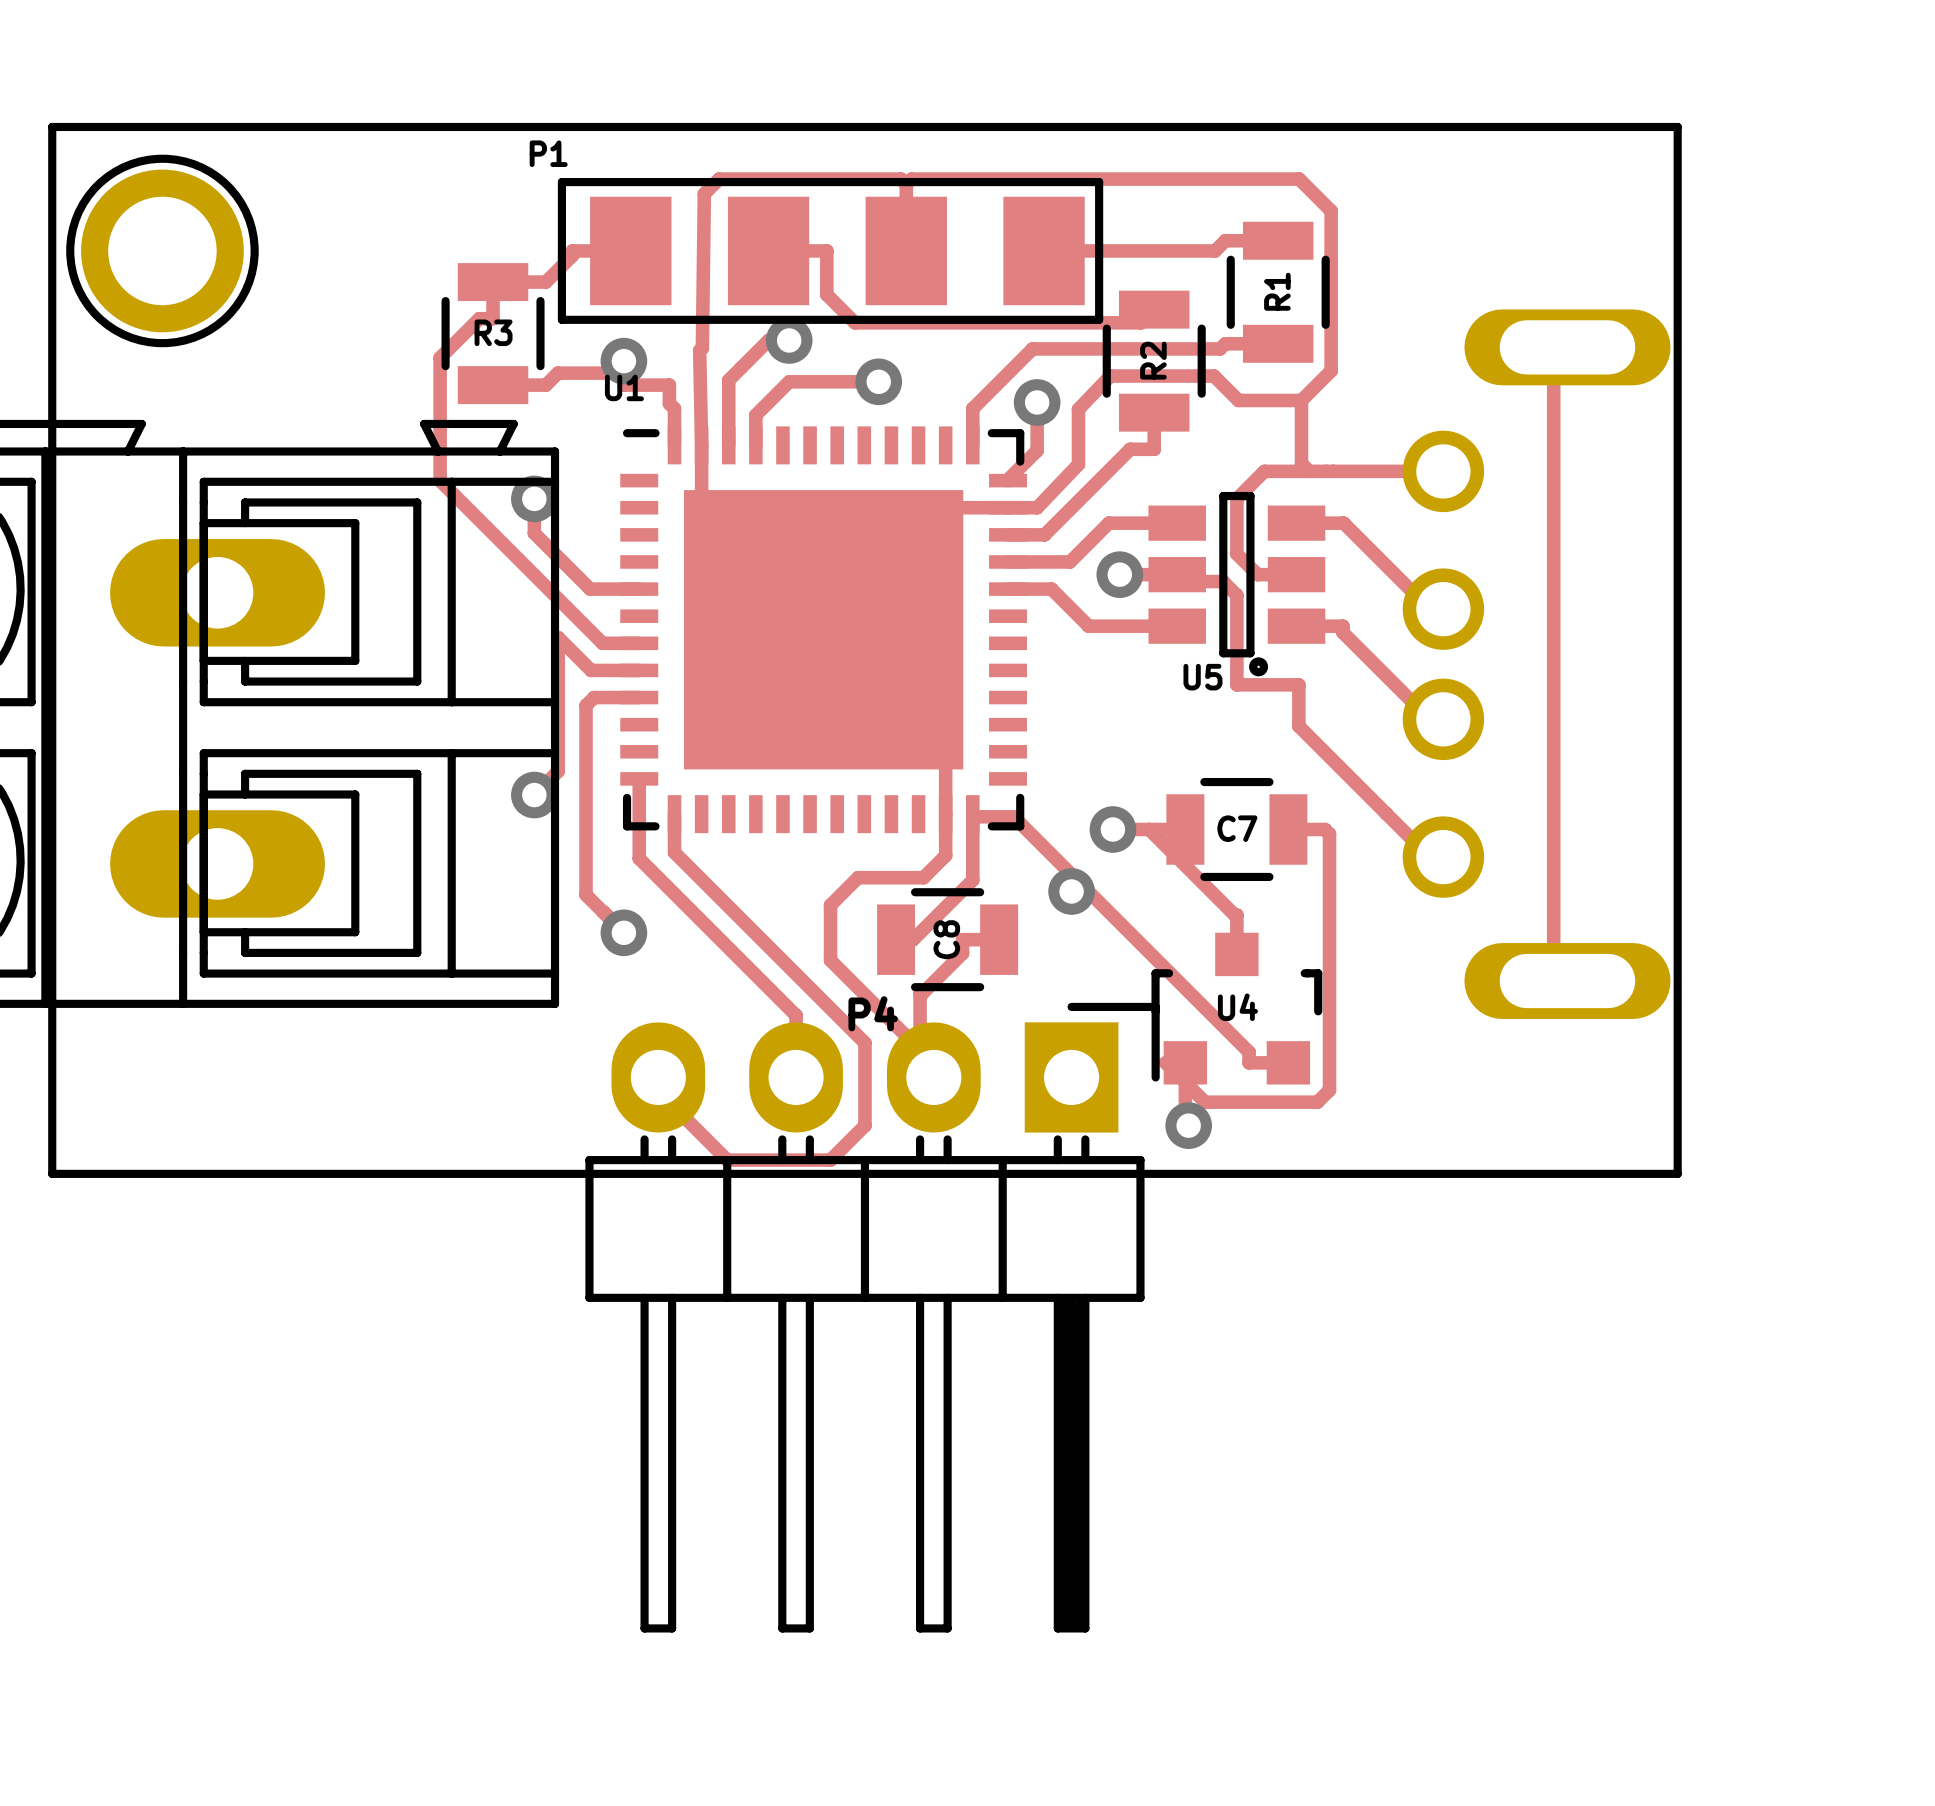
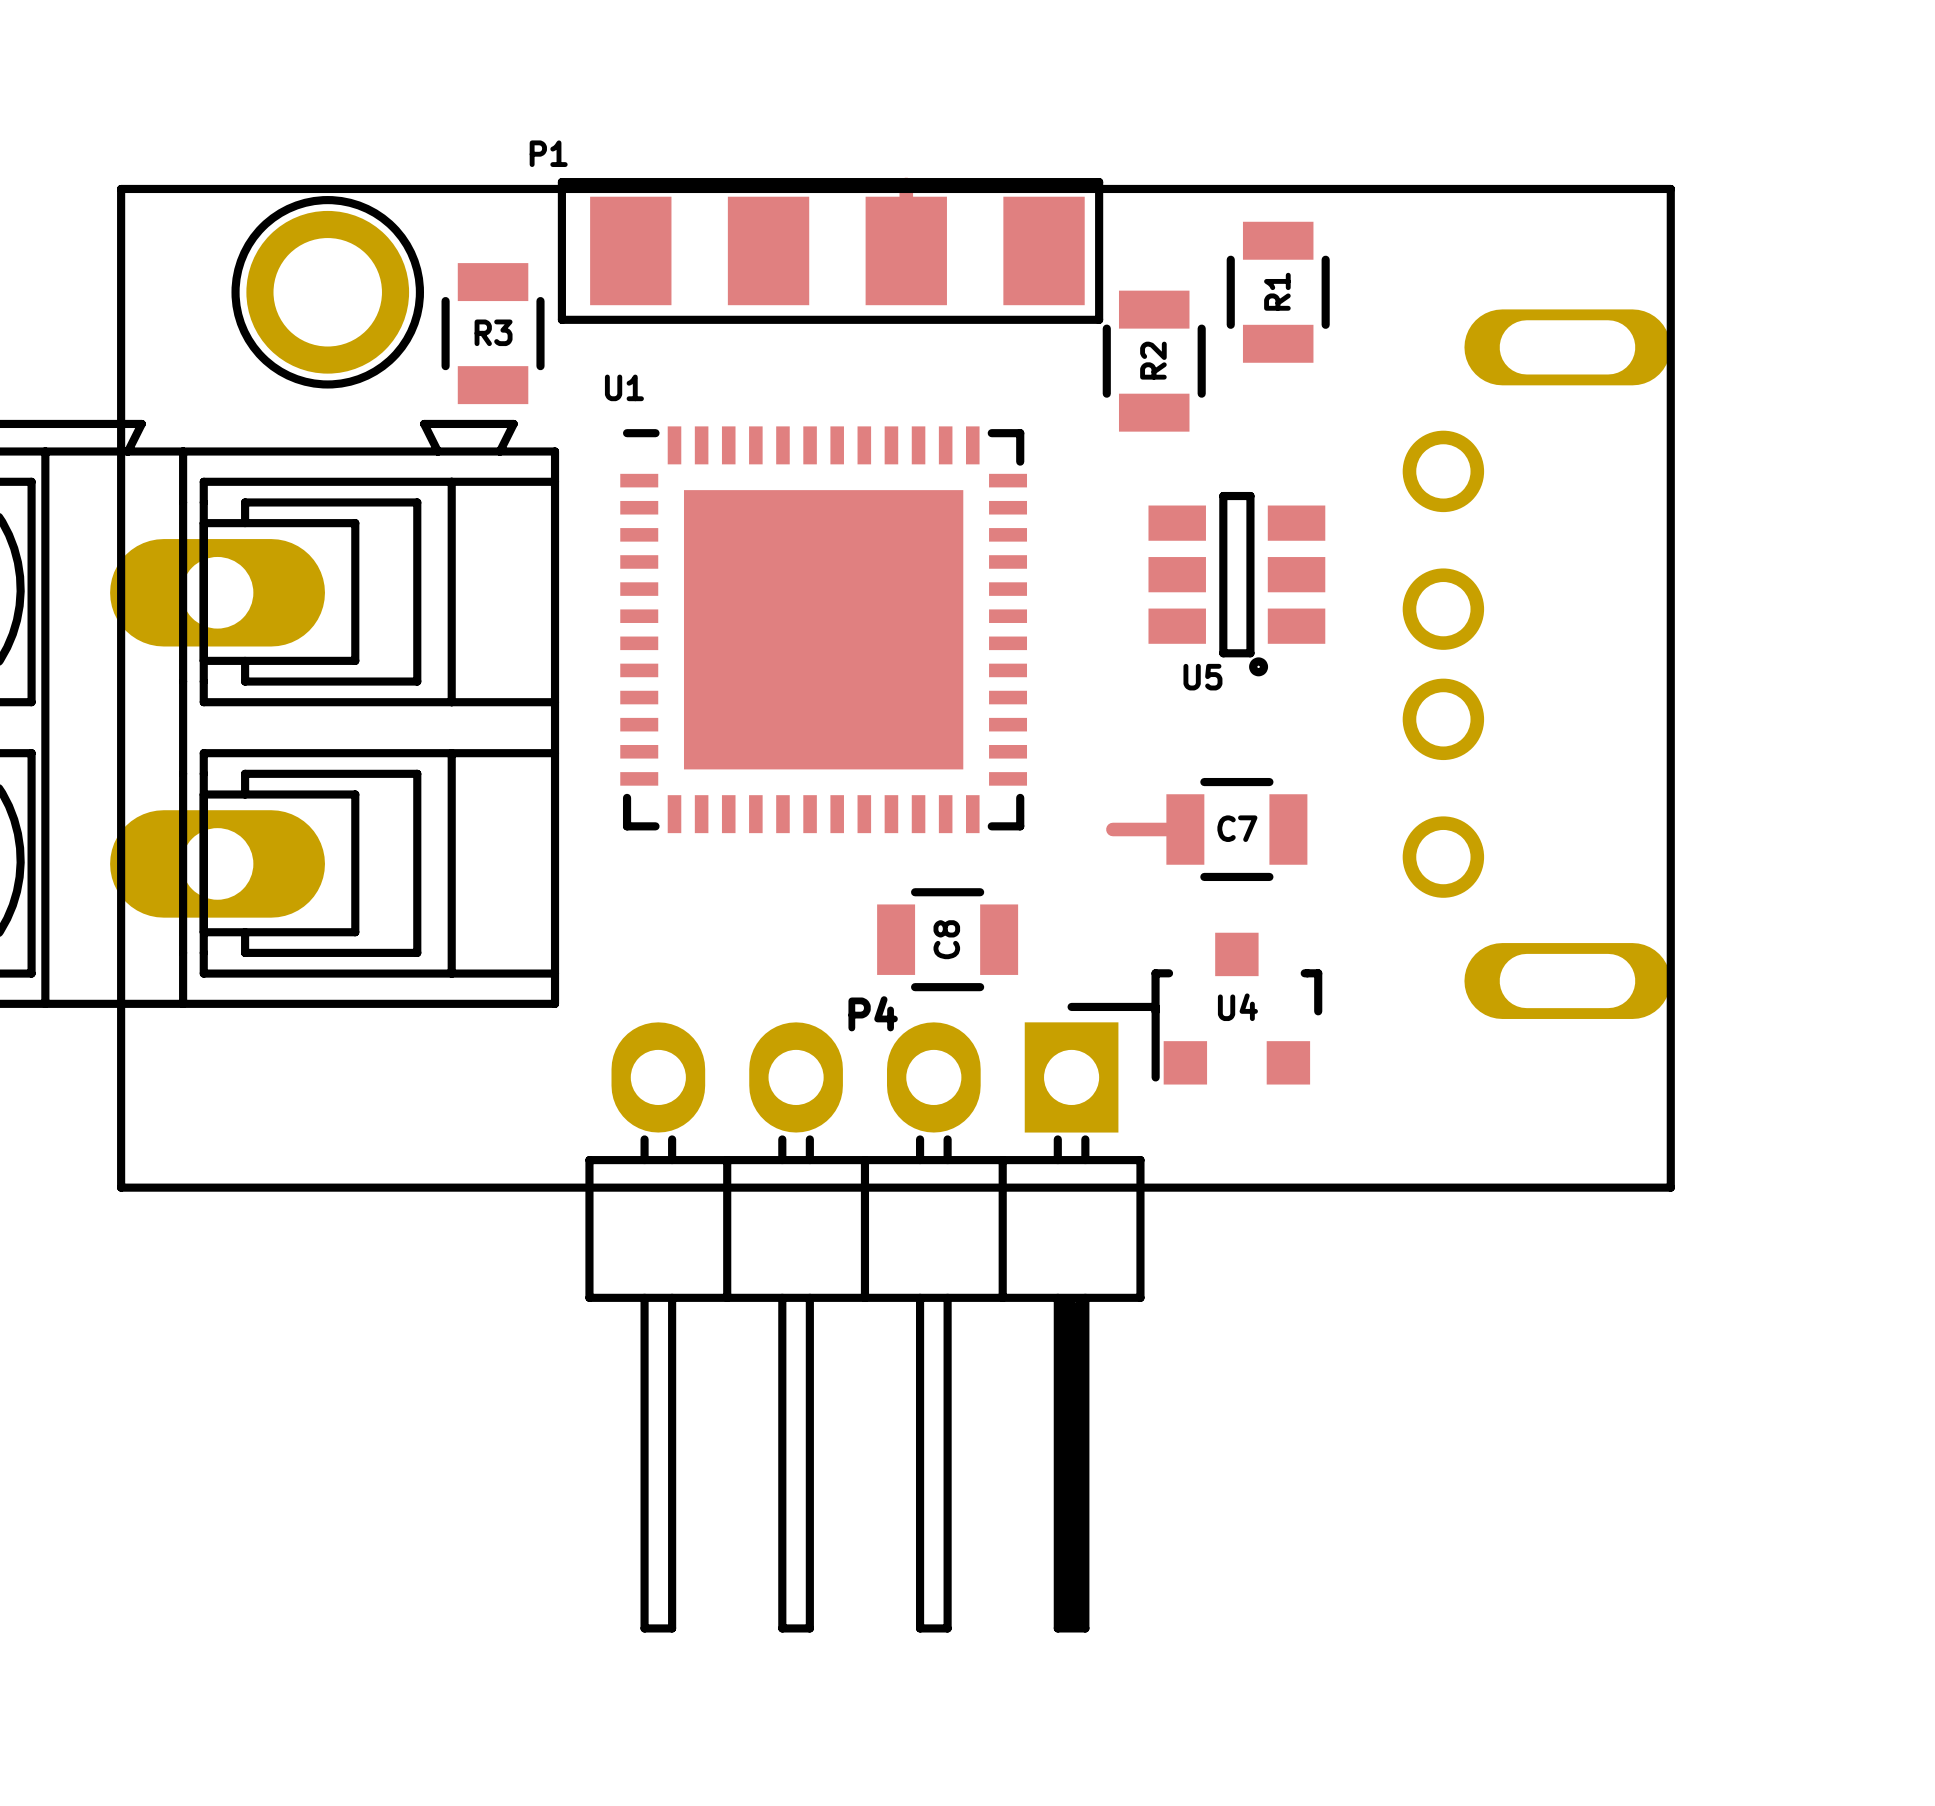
board edge: (52, 126) (1677, 126) (1677, 1173) (52, 1173) (52, 126) -> (121, 188) (121, 1187) (1670, 1187) (1670, 188) (121, 188)
track: (1278, 240) (1225, 240) (1215, 250) (1044, 250) -> none
part position: (162, 250) -> (327, 292)
track: (630, 250) (572, 250) (572, 255) (545, 282) (493, 282) (493, 318) (479, 318) (440, 357) (440, 480) (602, 643) (639, 643) -> none
track: (768, 250) (826, 250) (826, 294) (854, 322) (1141, 322) (1154, 309) -> none
track: (789, 340) (768, 340) (728, 380) (728, 445) -> none
via: (789, 340) -> none
track: (1278, 343) (1225, 343) (1220, 348) (1032, 348) (972, 408) (972, 445) -> none
track: (1553, 347) (1553, 981) -> none
track: (623, 361) (623, 385) (669, 385) (669, 403) (674, 408) (674, 445) -> none
via: (623, 361) -> none
track: (623, 373) (557, 373) (545, 385) (493, 385) -> none
track: (878, 381) (789, 381) (755, 415) (755, 445) -> none
via: (878, 381) -> none
track: (1301, 400) (1238, 400) (1214, 376) (1110, 376) (1078, 409) (1078, 464) (1037, 507) (945, 507) (928, 525) (928, 734) (945, 751) (945, 855) (923, 877) (858, 877) (830, 905) (830, 960) (933, 1063) (933, 1077) (920, 1091) (920, 993) (962, 953) (962, 939) (999, 939) -> none
track: (1301, 400) (1301, 463) (1309, 471) -> none
track: (1301, 400) (1331, 370) (1331, 211) (1299, 179) (911, 179) (906, 184) (900, 179) (719, 179) (704, 193) (702, 348) (699, 350) (701, 507) (718, 525) (710, 516) -> none
track: (1037, 402) (1037, 450) (1008, 479) -> none
via: (1037, 402) -> none
track: (1154, 412) (1154, 449) (1130, 449) (1044, 534) (1008, 534) -> none
track: (1429, 471) (1264, 471) (1236, 498) (1236, 554) (1257, 574) (1296, 574) -> none
track: (534, 498) (534, 533) (590, 589) (639, 589) -> none
via: (534, 498) -> none
track: (1177, 523) (1108, 523) (1070, 561) (1008, 561) -> none
track: (1296, 523) (1343, 523) (1429, 609) -> none
track: (1119, 574) (1177, 574) (1184, 581) (1223, 581) (1236, 595) (1236, 684) (1298, 684) (1298, 726) (1429, 856) -> none
via: (1119, 574) -> none
track: (1008, 589) (1051, 589) (1088, 626) (1177, 626) -> none
track: (1296, 626) (1342, 626) (1342, 632) (1429, 719) -> none
track: (639, 670) (591, 670) (558, 637) (558, 771) (534, 795) -> none
track: (639, 697) (594, 697) (586, 705) (586, 894) (623, 932) -> none
track: (639, 778) (639, 858) (796, 1015) (796, 1077) -> none
via: (534, 795) -> none
track: (674, 814) (674, 852) (864, 1043) (864, 1125) (830, 1160) (727, 1160) (658, 1091) (658, 1077) -> none
track: (972, 814) (972, 880) (913, 939) (896, 939) -> none
track: (972, 816) (1013, 816) (1249, 1052) (1249, 1062) (1288, 1062) -> none
via: (1112, 829) -> none
track: (1149, 829) (1234, 915) (1236, 915) (1236, 954) -> none
track: (1288, 829) (1325, 829) (1329, 833) (1329, 1090) (1317, 1102) (1205, 1102) (1165, 1062) (1185, 1062) (1185, 1122) (1188, 1125) -> none
via: (1071, 891) -> none
via: (623, 932) -> none
via: (1188, 1125) -> none

